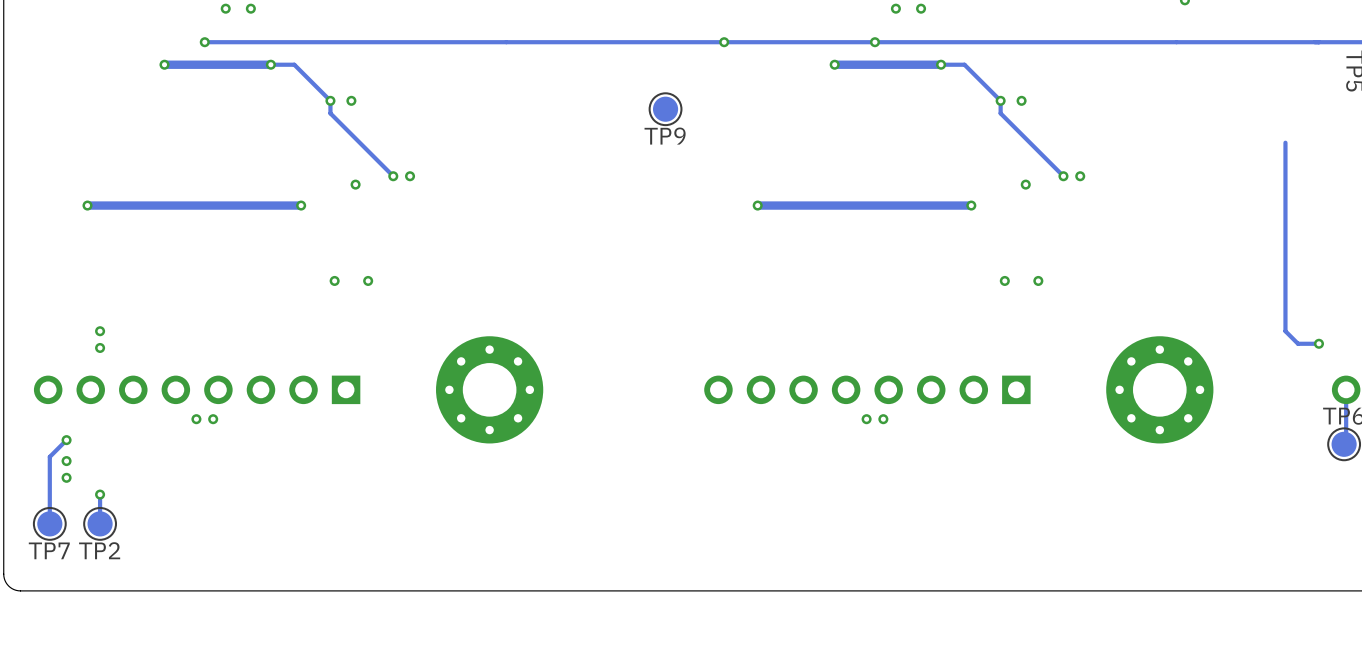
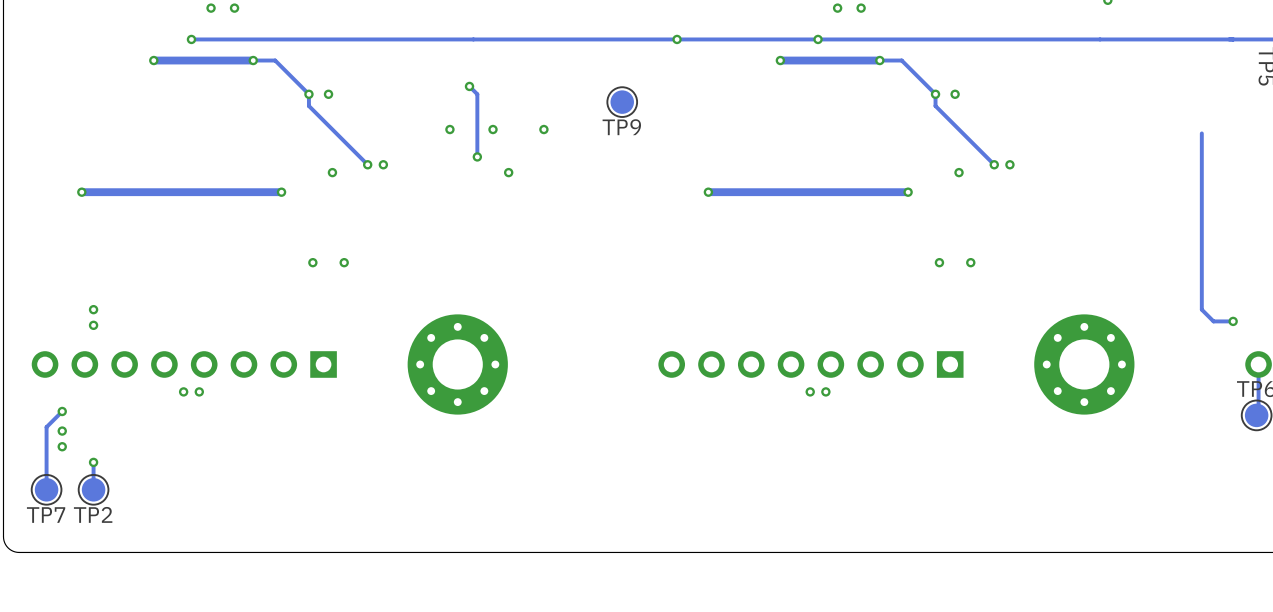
track: none -> (469, 86) (477, 94) (477, 156)
via: none -> (469, 86)
via: none -> (449, 129)
via: none -> (493, 129)
via: none -> (543, 129)
via: none -> (477, 156)
via: none -> (508, 172)

